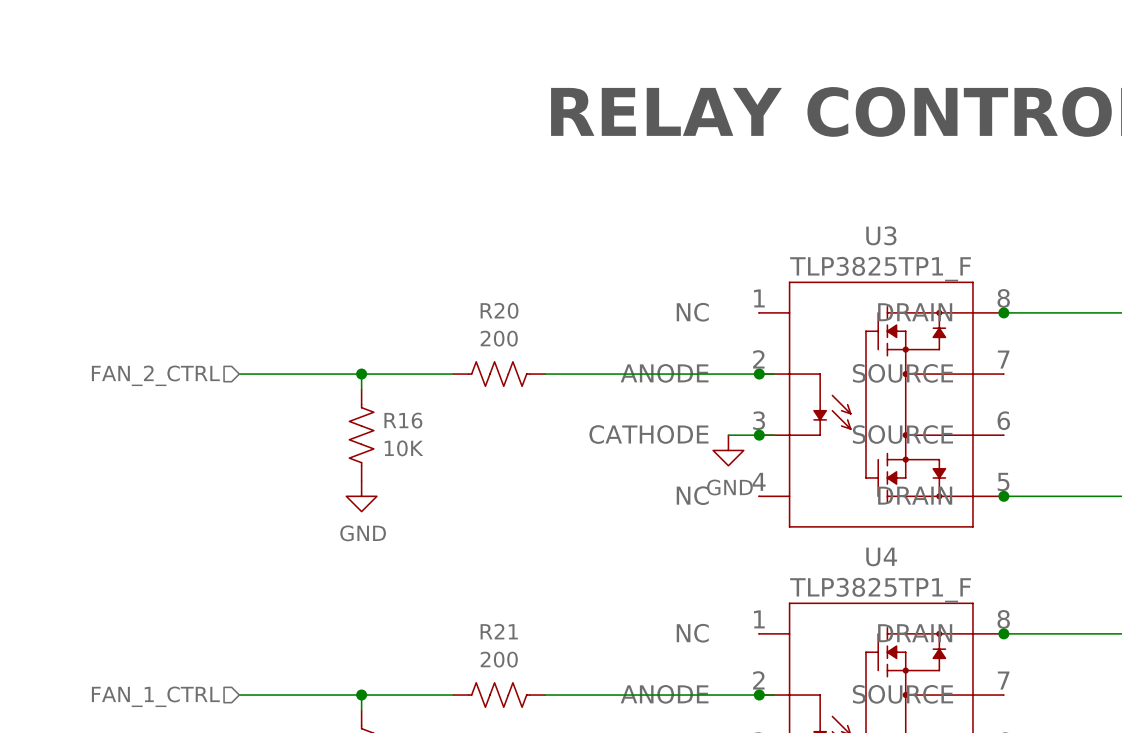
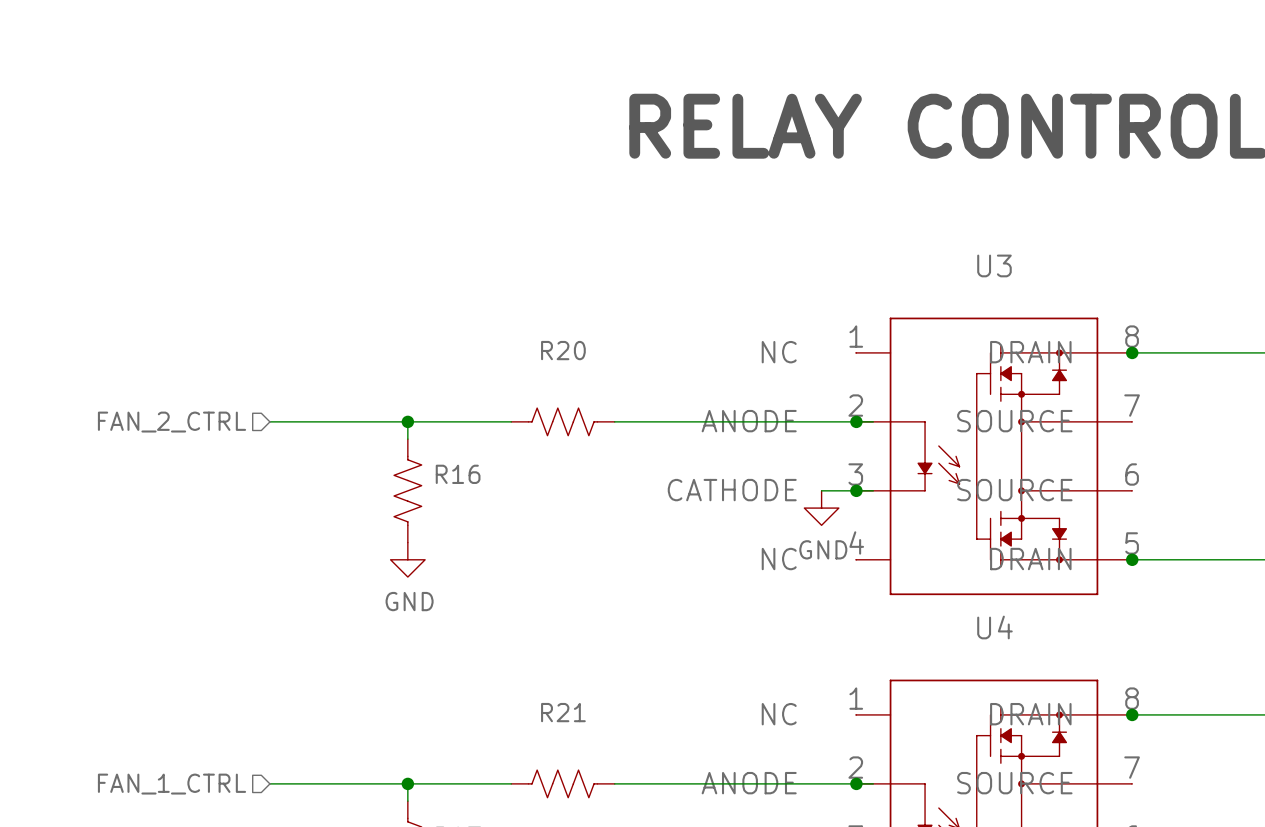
U3 value: TLP3825TP1_F (880, 269) -> none
R20 value: 200 (499, 338) -> none
R16 value: 10K (403, 448) -> none
U4 value: TLP3825TP1_F (880, 590) -> none
R21 value: 200 (499, 659) -> none

